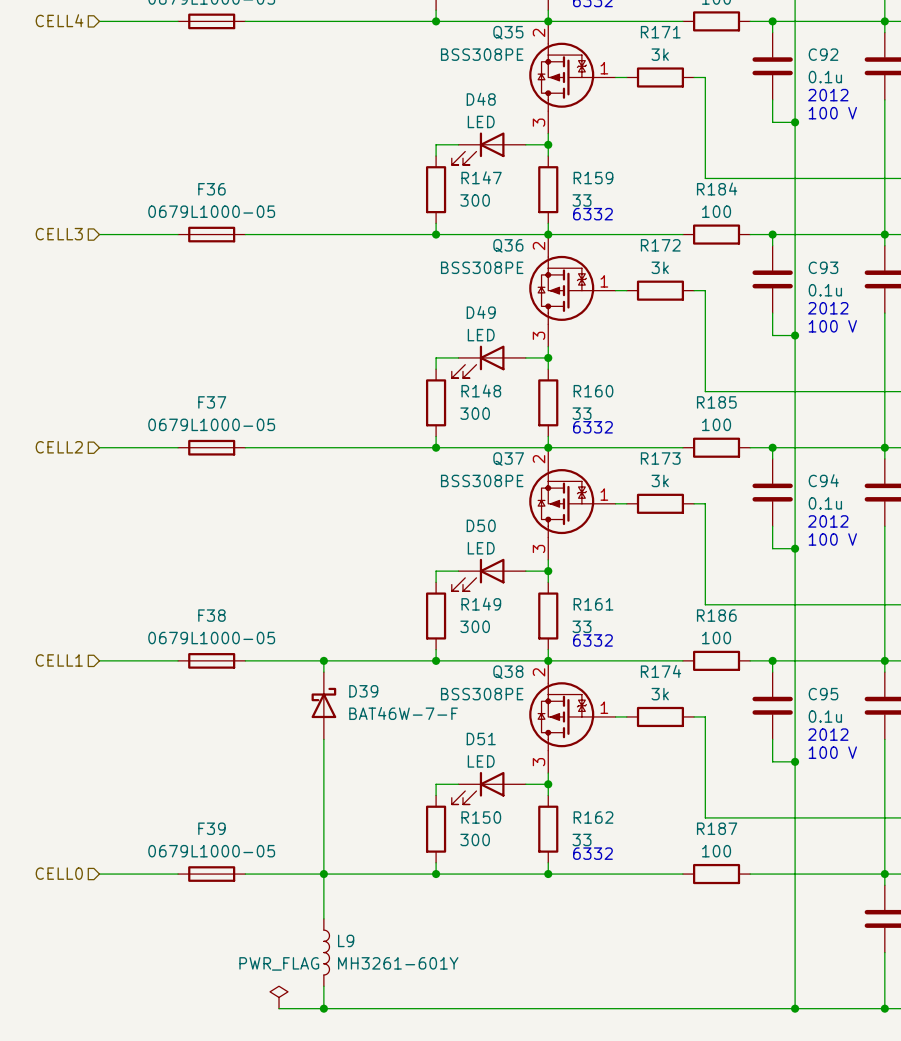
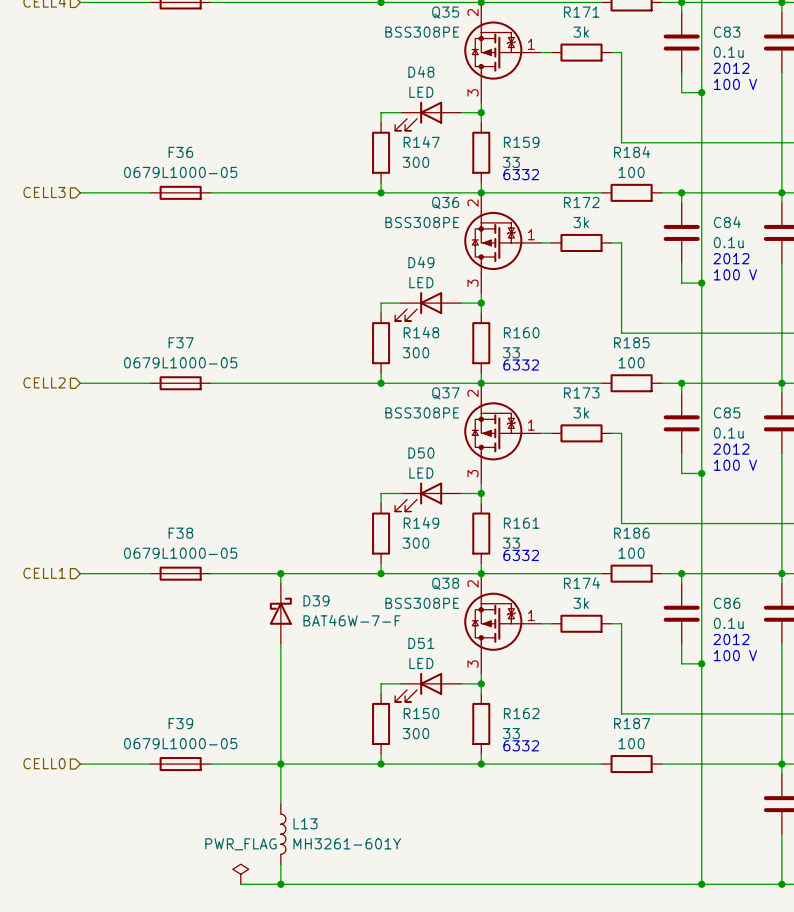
C92 name: C92 (823, 54) -> C83 (727, 32)
C93 name: C93 (823, 267) -> C84 (727, 222)
C94 name: C94 (823, 480) -> C85 (727, 412)
C95 name: C95 (823, 694) -> C86 (727, 603)
L9 name: L9 (346, 940) -> L13 (305, 823)

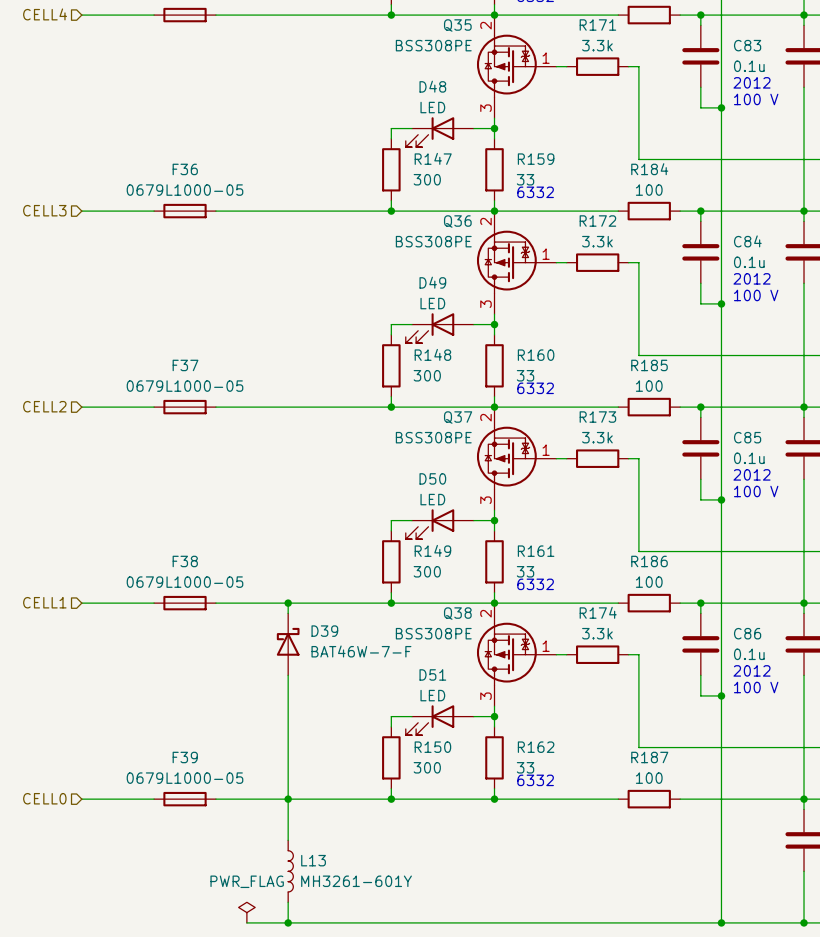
R171 value: 3k (581, 32) -> 3.3k (597, 45)
R172 value: 3k (581, 222) -> 3.3k (597, 241)
R173 value: 3k (581, 412) -> 3.3k (597, 437)
R174 value: 3k (581, 603) -> 3.3k (597, 633)

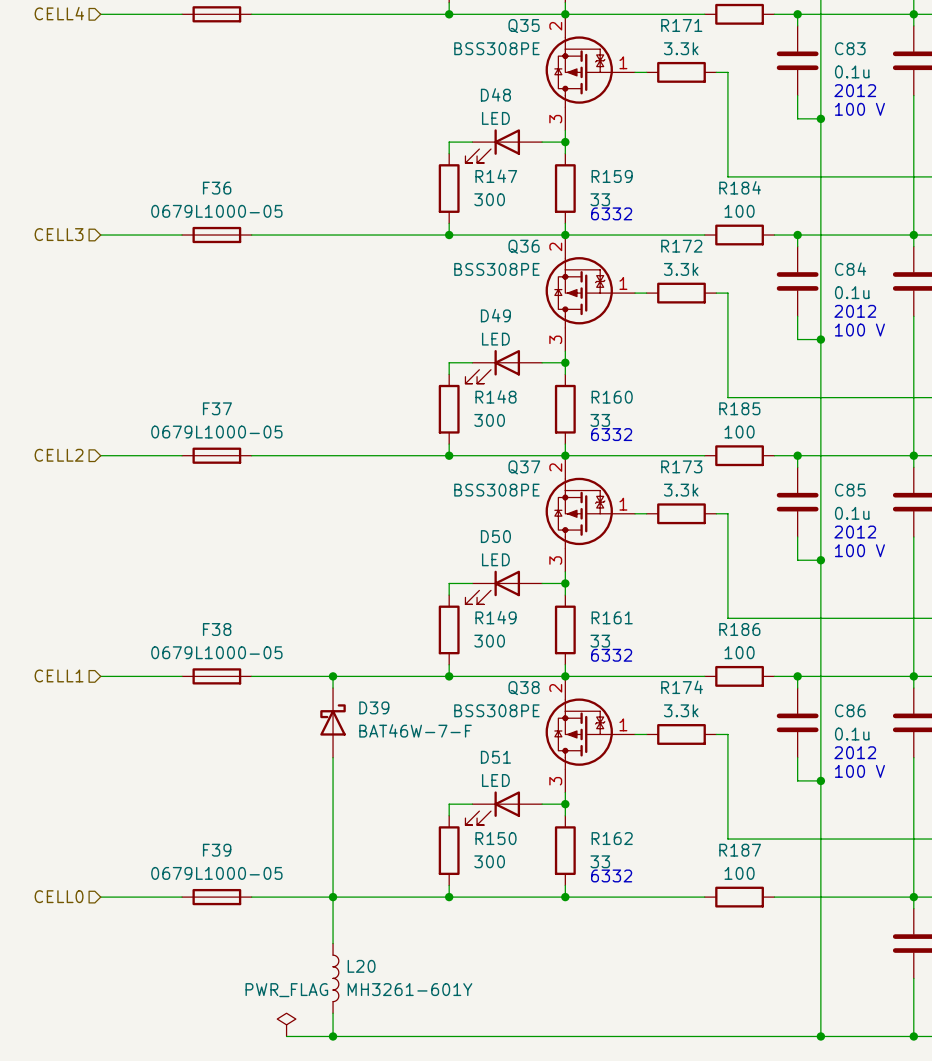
L13 name: L13 (313, 860) -> L20 (361, 966)

